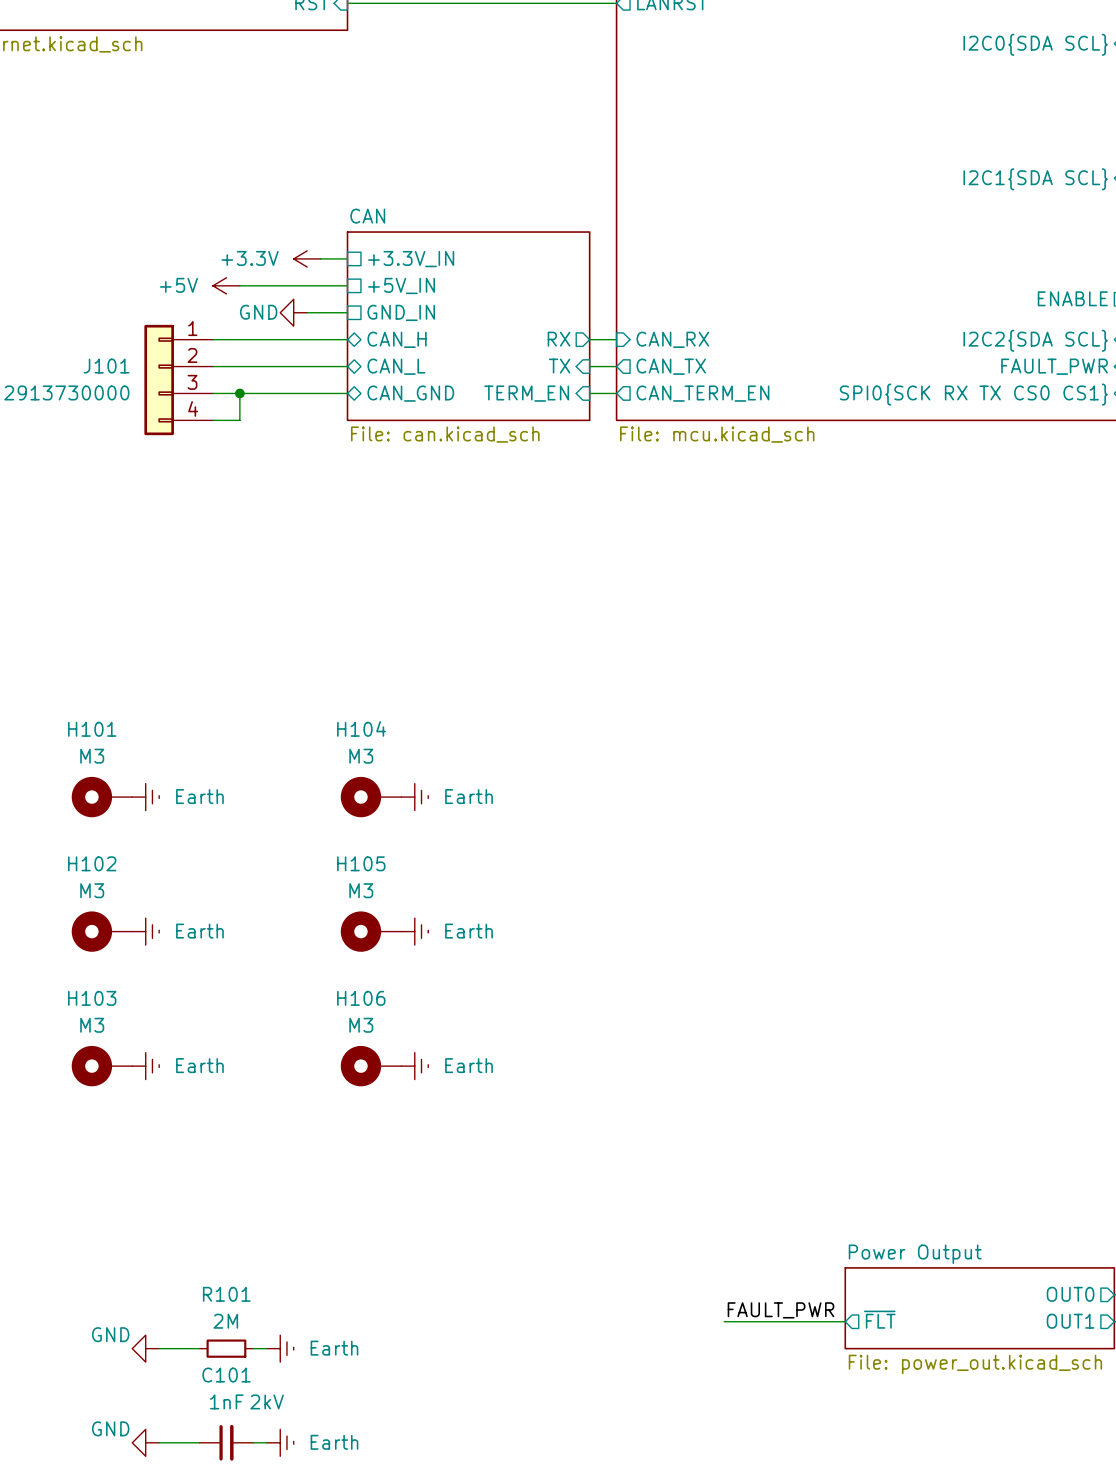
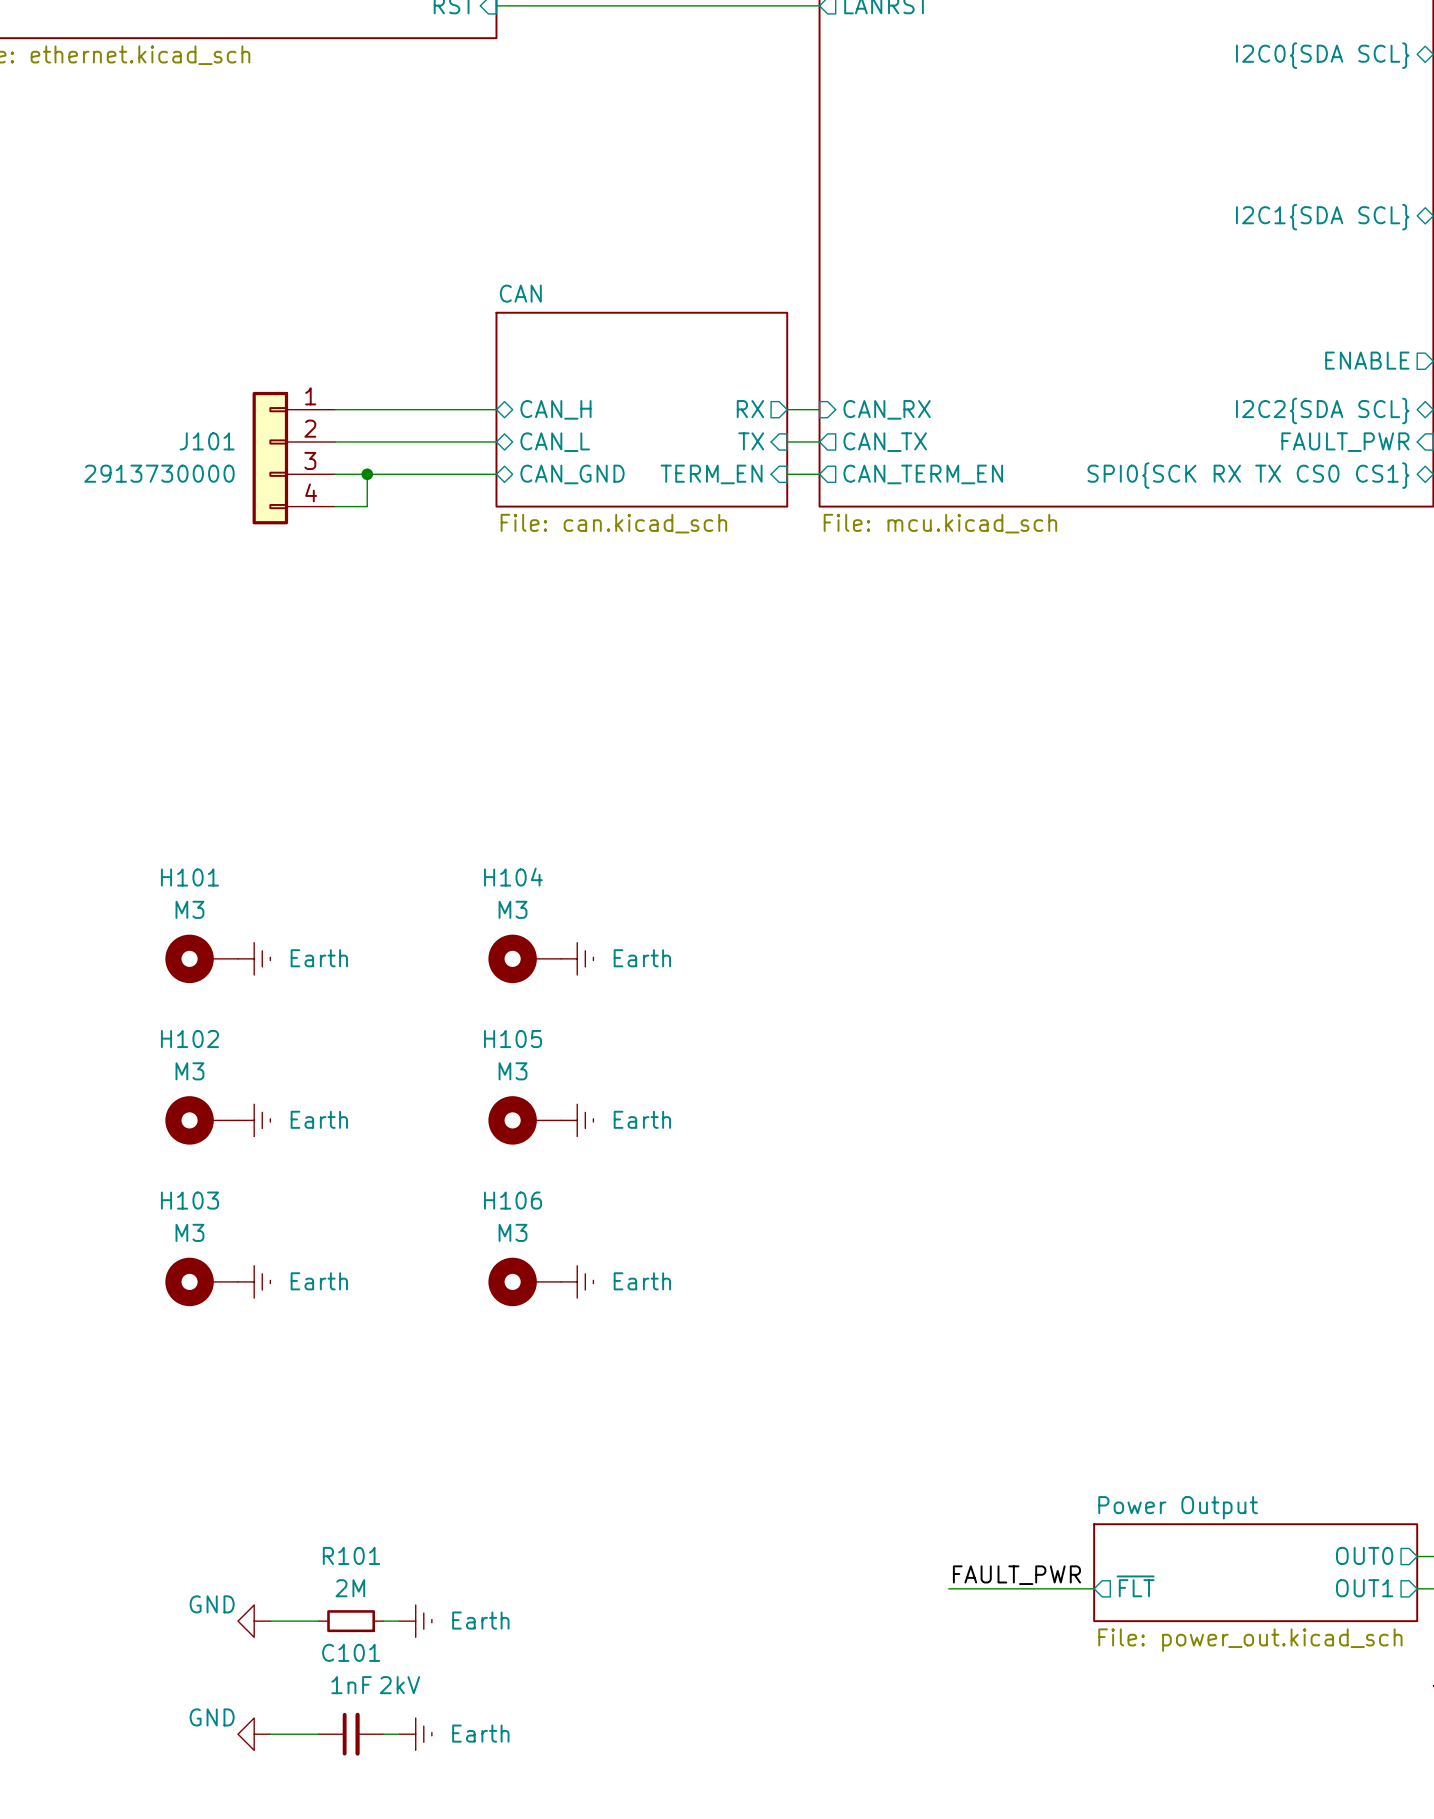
power symbol: +3.3V (307, 258) -> none
wire: (320, 258) (347, 258) -> none
sheet pin: +3.3V_IN (411, 259) -> none
power symbol: +5V (226, 285) -> none
wire: (239, 285) (347, 285) -> none
sheet pin: +5V_IN (401, 285) -> none
power symbol: GND (293, 312) -> none
wire: (307, 312) (347, 312) -> none
sheet pin: GND_IN (401, 312) -> none
sheet CAN: File: can.kicad_sch (468, 326) -> none
sheet CAN: none -> File: can.kicad_sch (641, 409)

